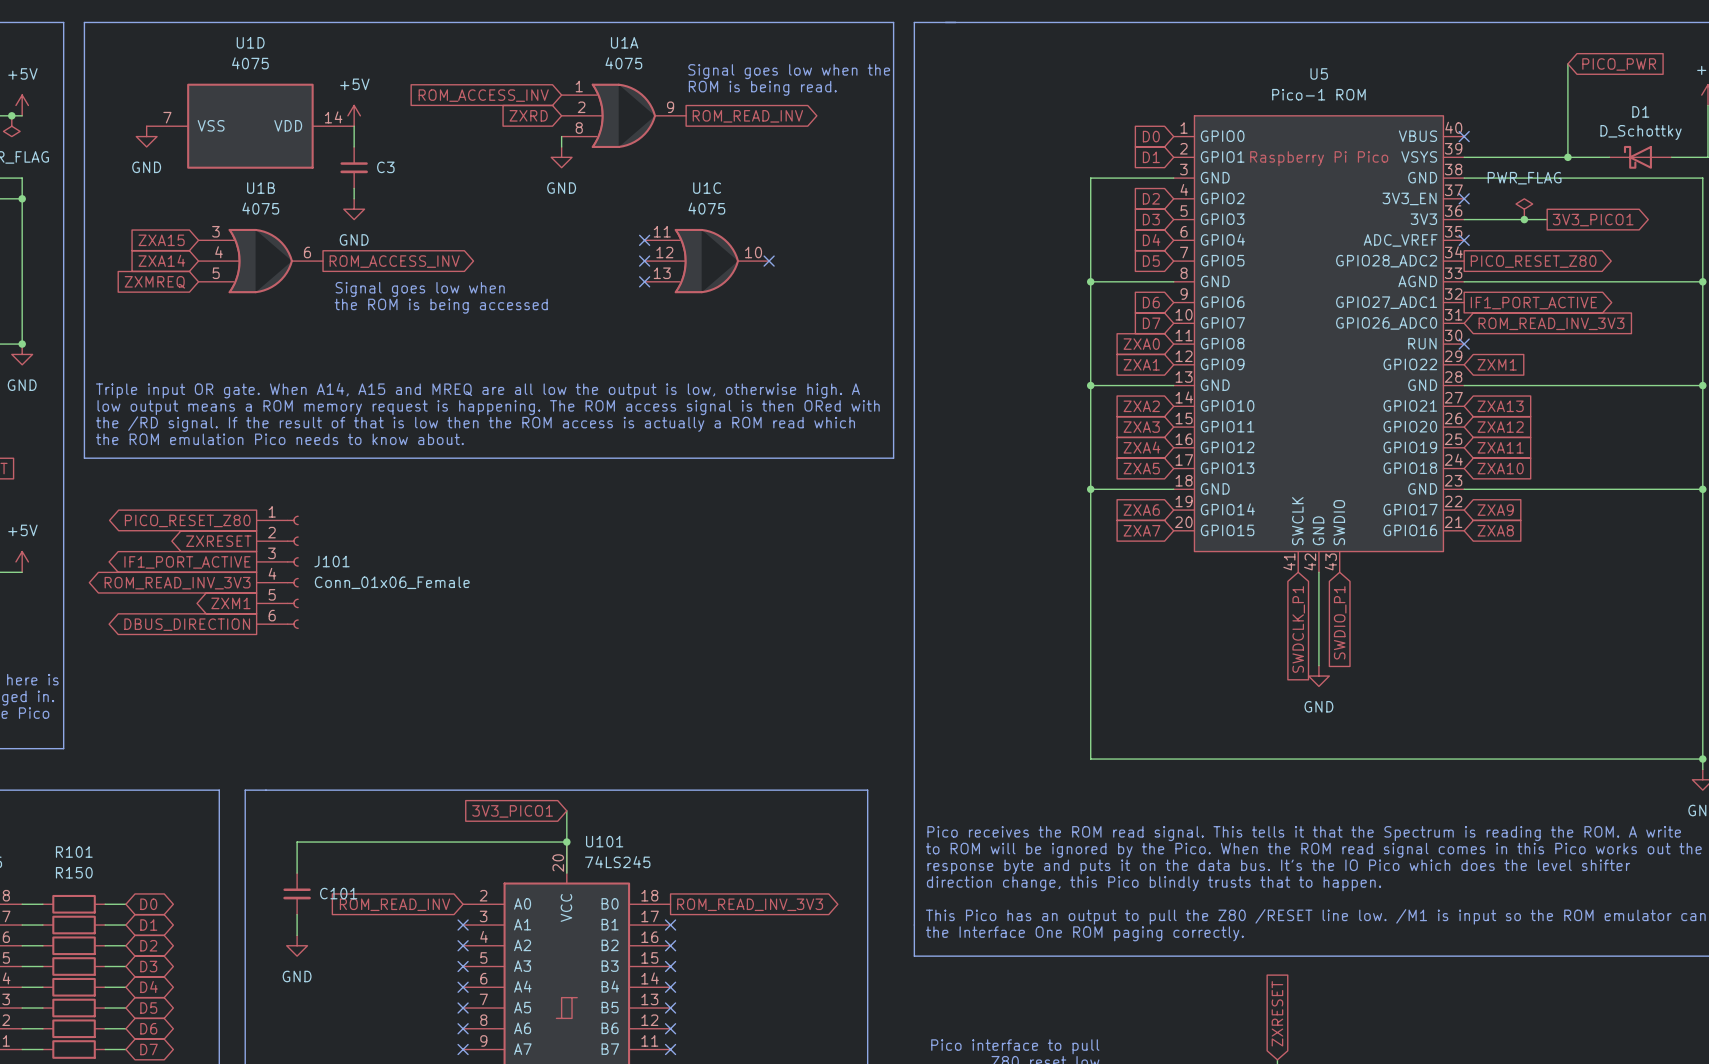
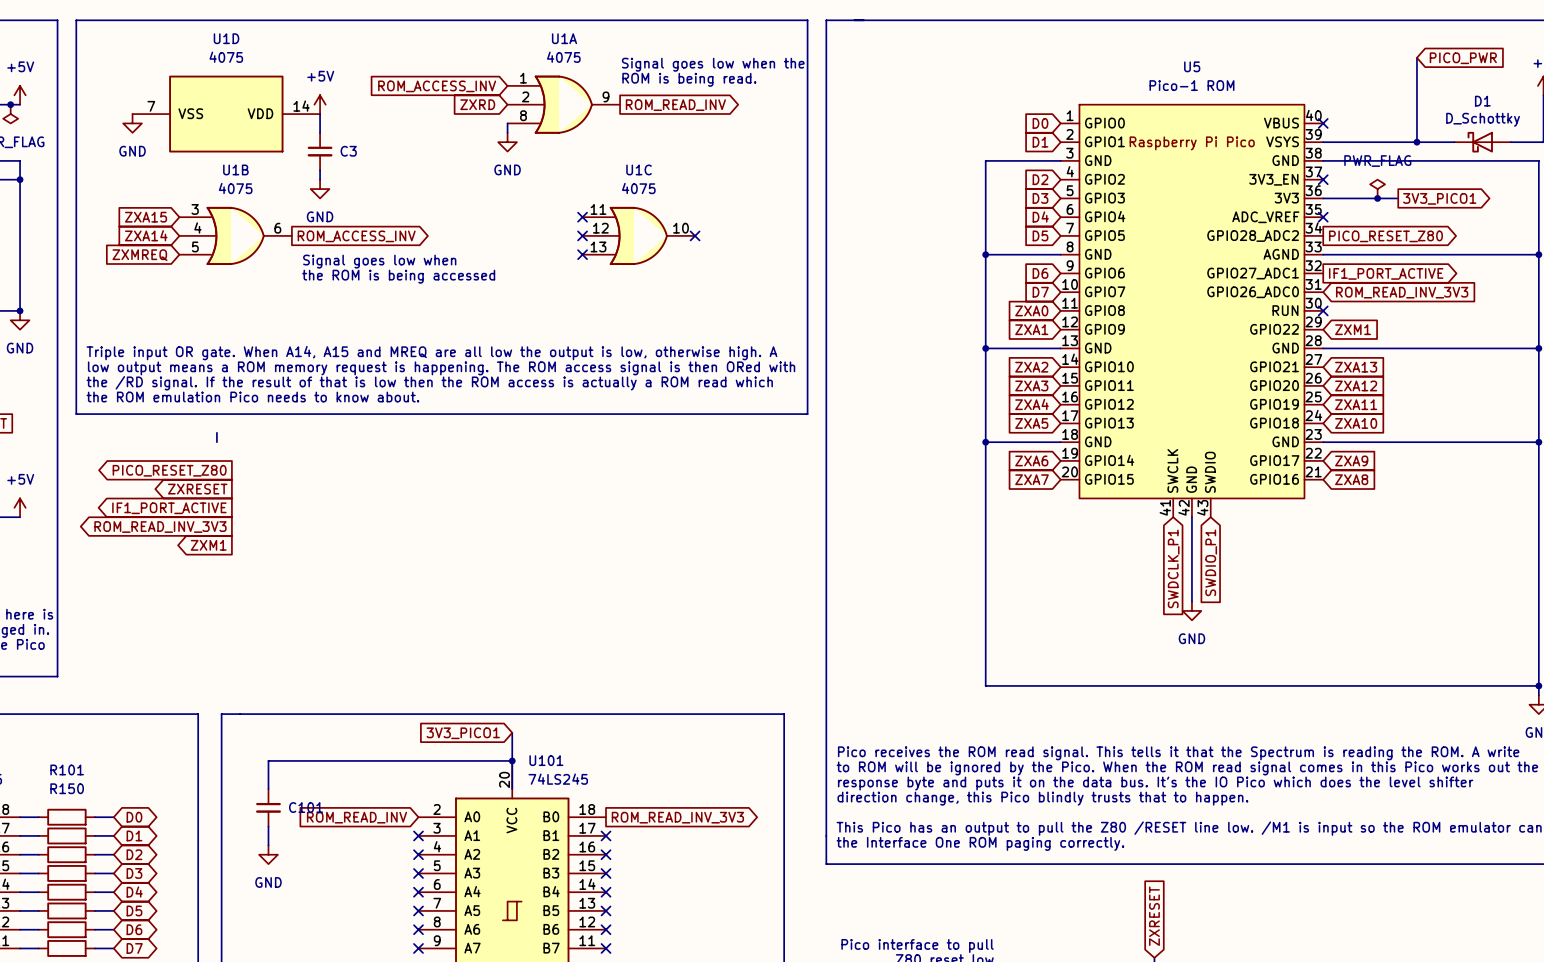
line: none -> (216, 432) (216, 442)
J101: Conn_01x06_Female (277, 572) -> none
global label: DBUS_DIRECTION (187, 624) -> none

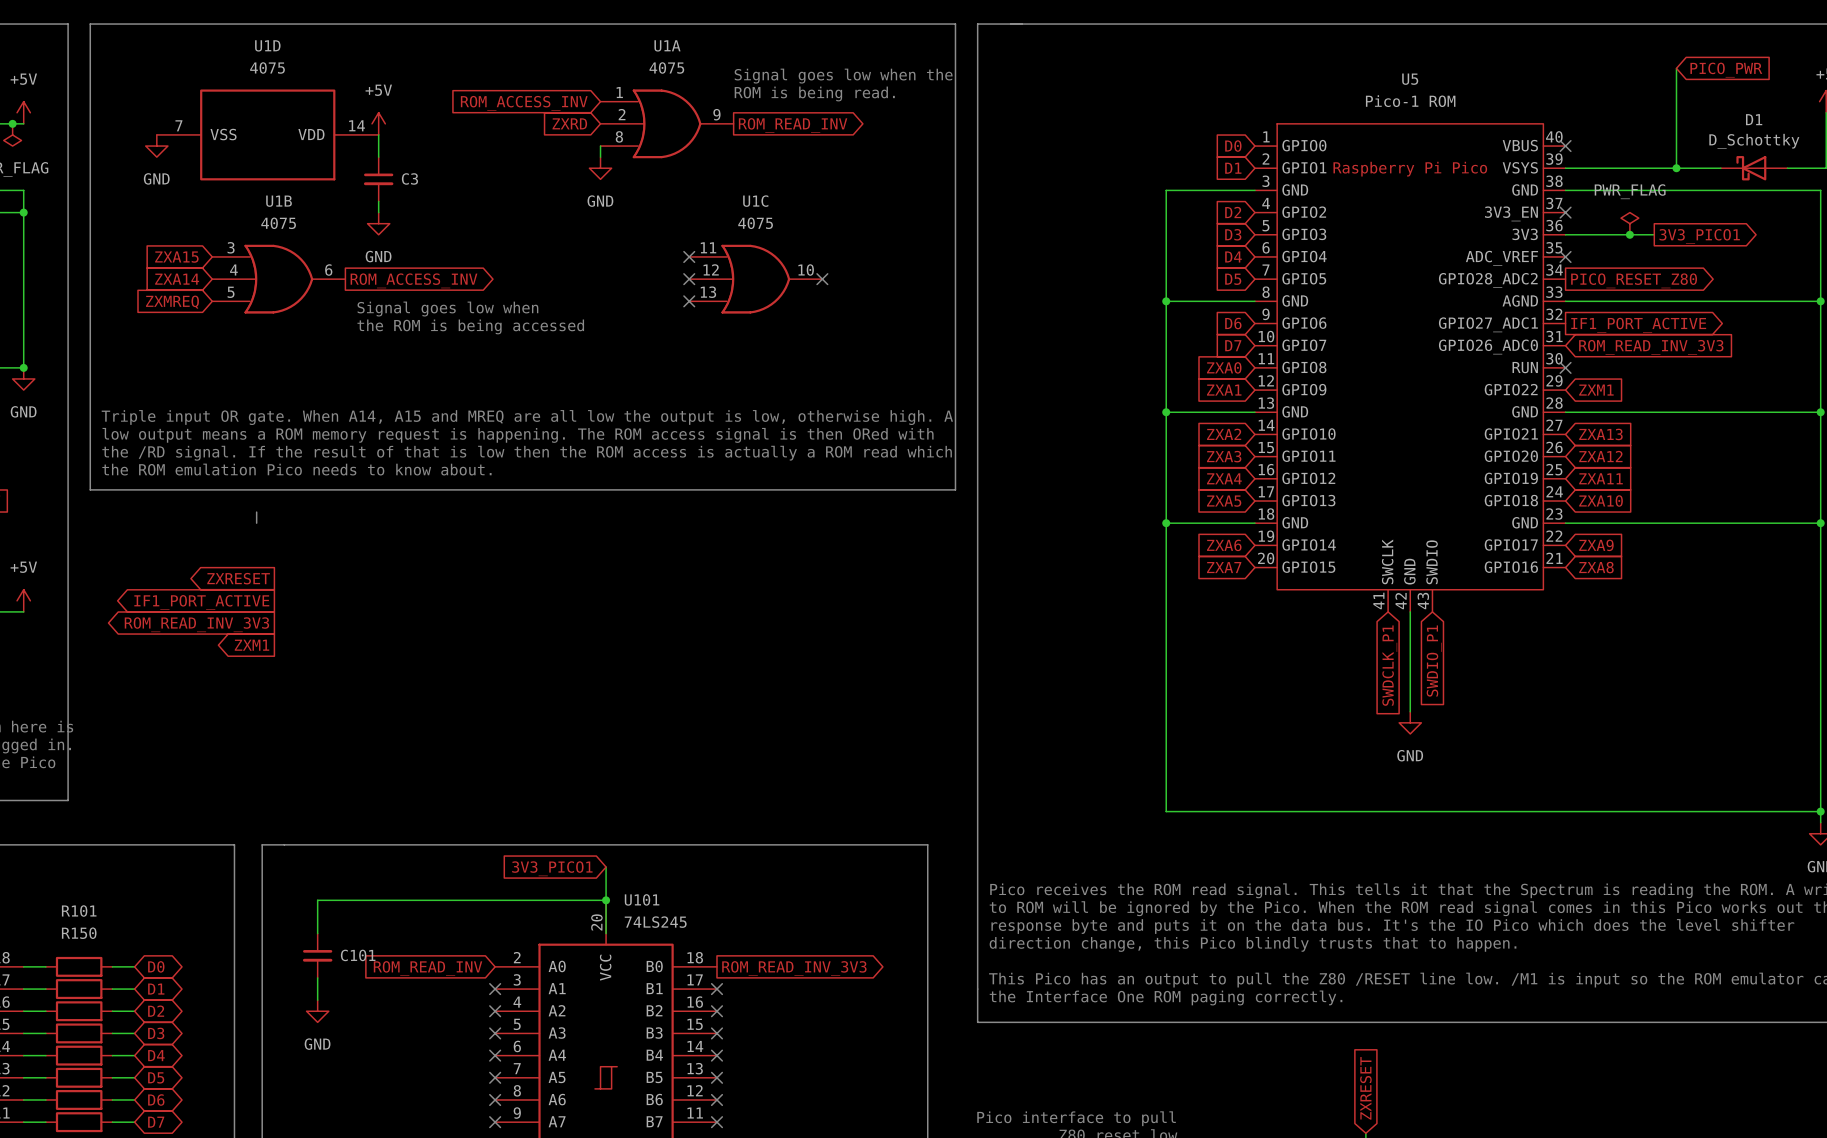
global label: PICO_RESET_Z80 (169, 470) -> none

